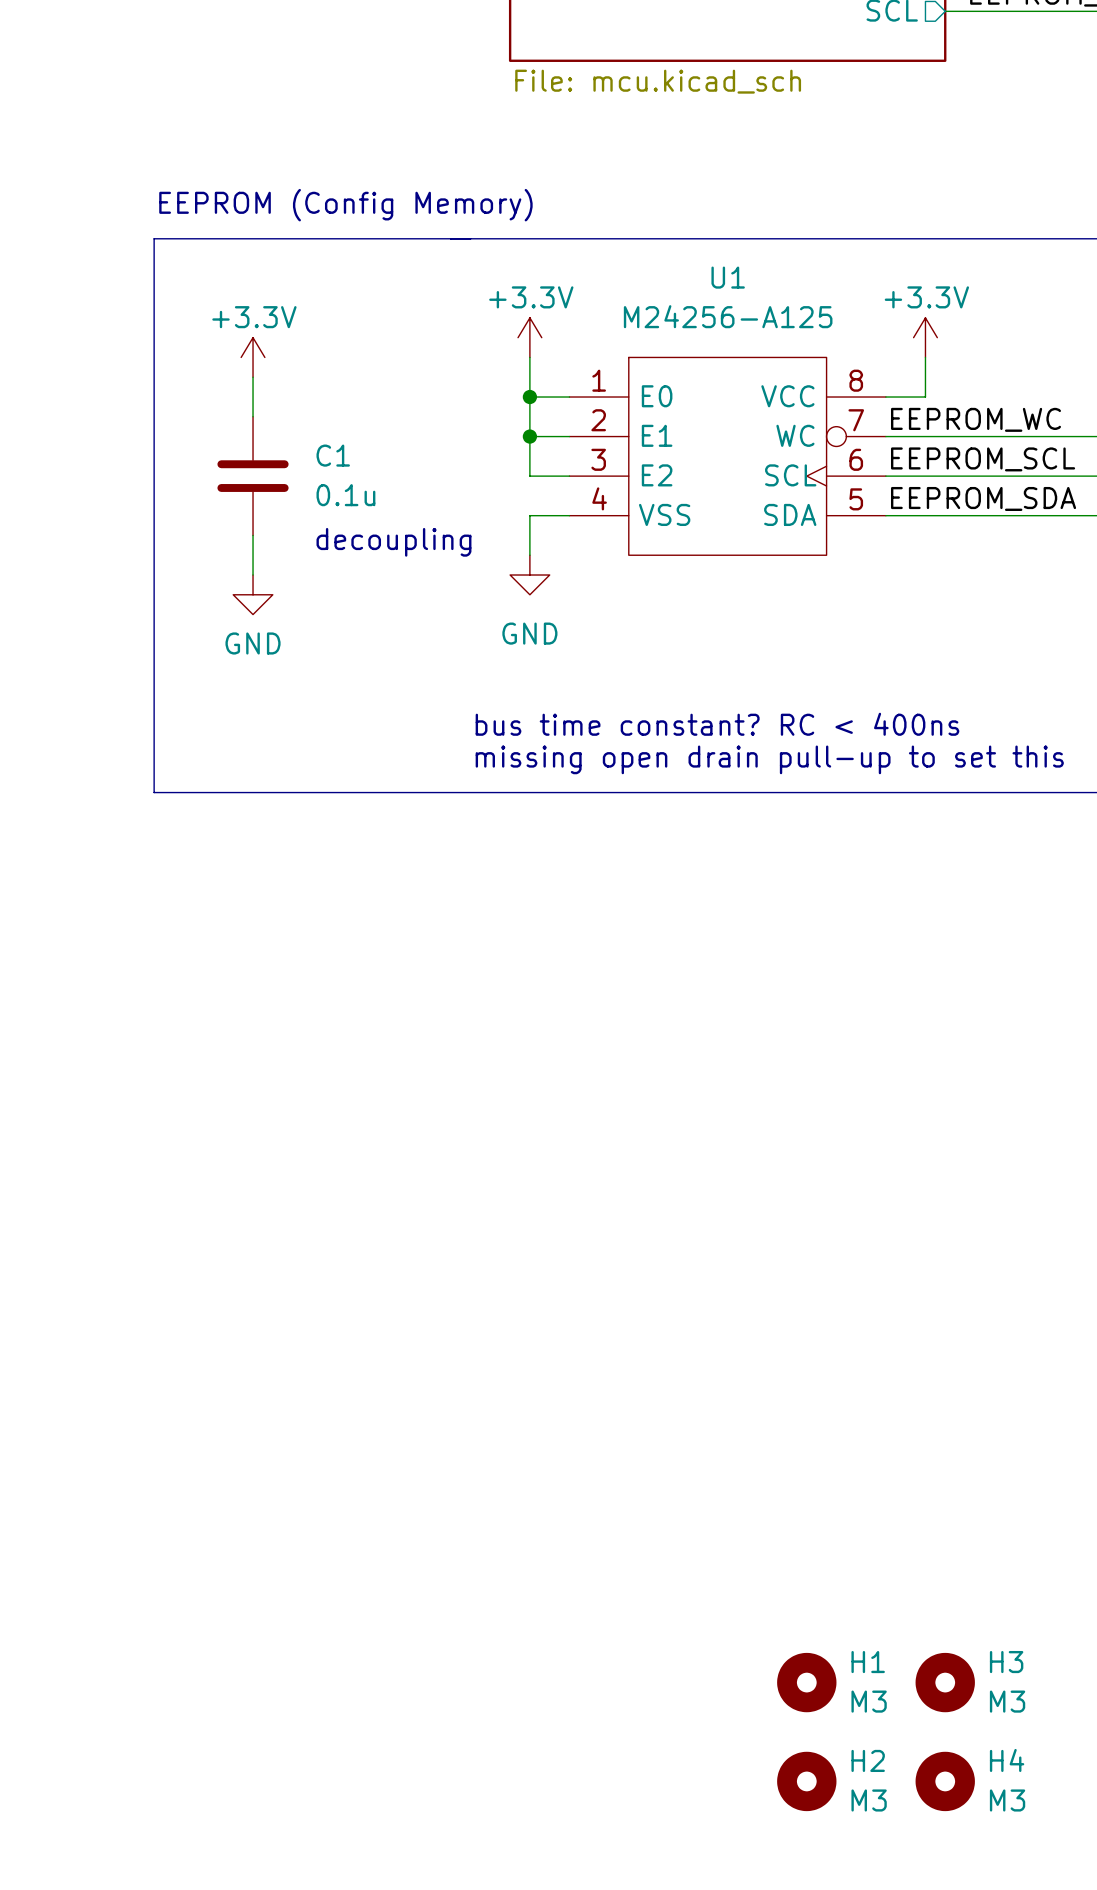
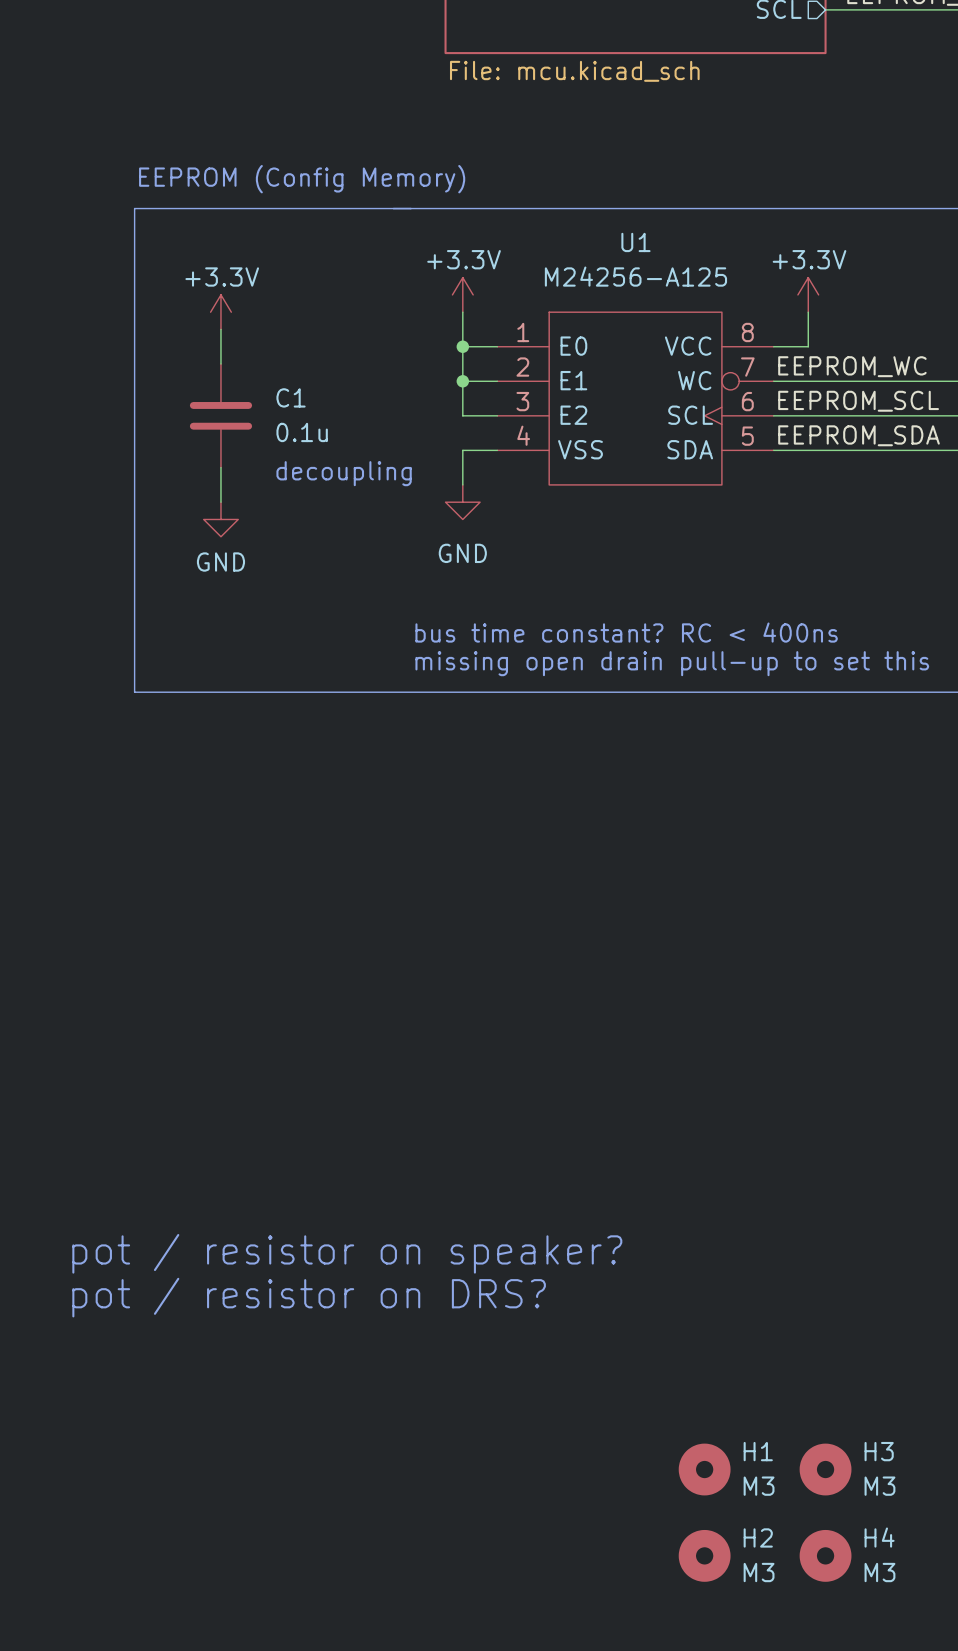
text: none -> pot / resistor on speaker? (347, 1253)
text: none -> pot / resistor on DRS? (309, 1297)

